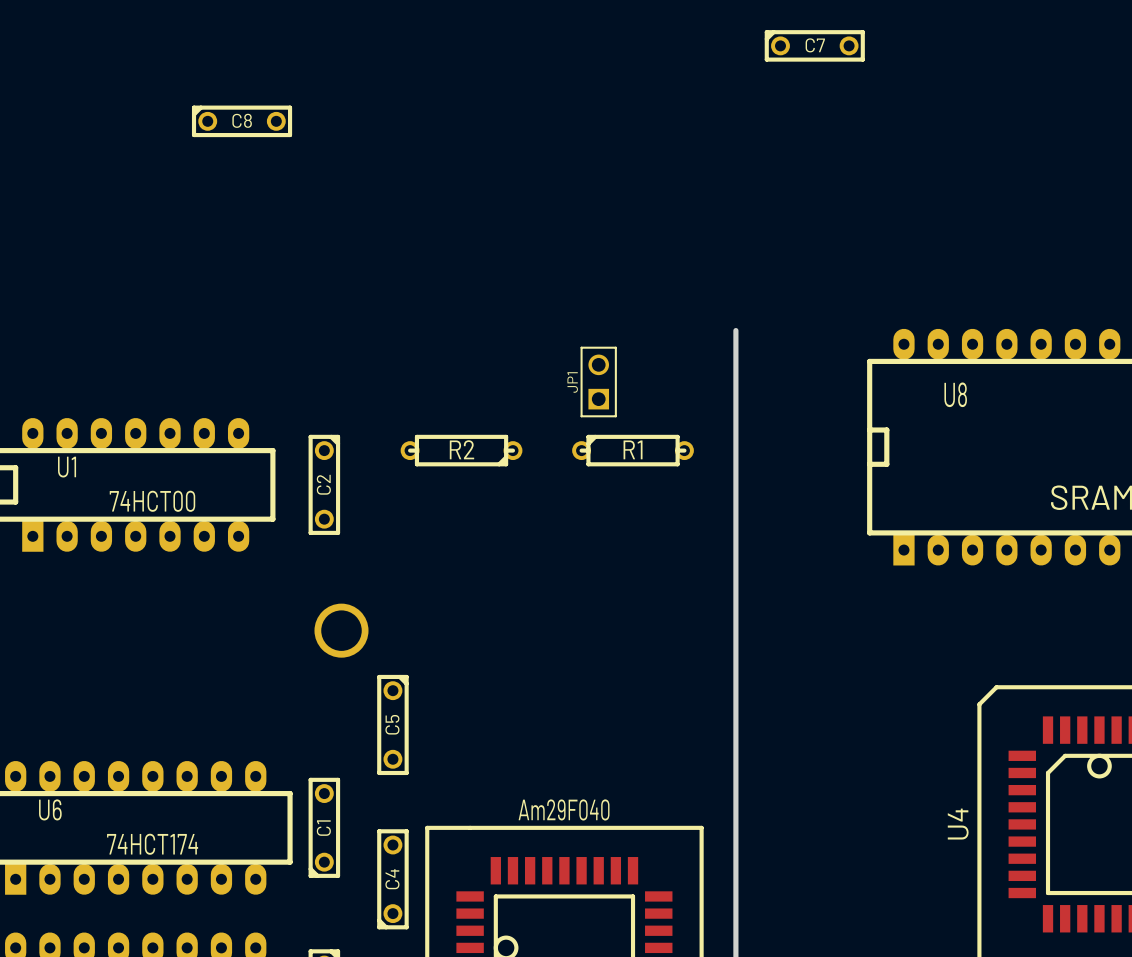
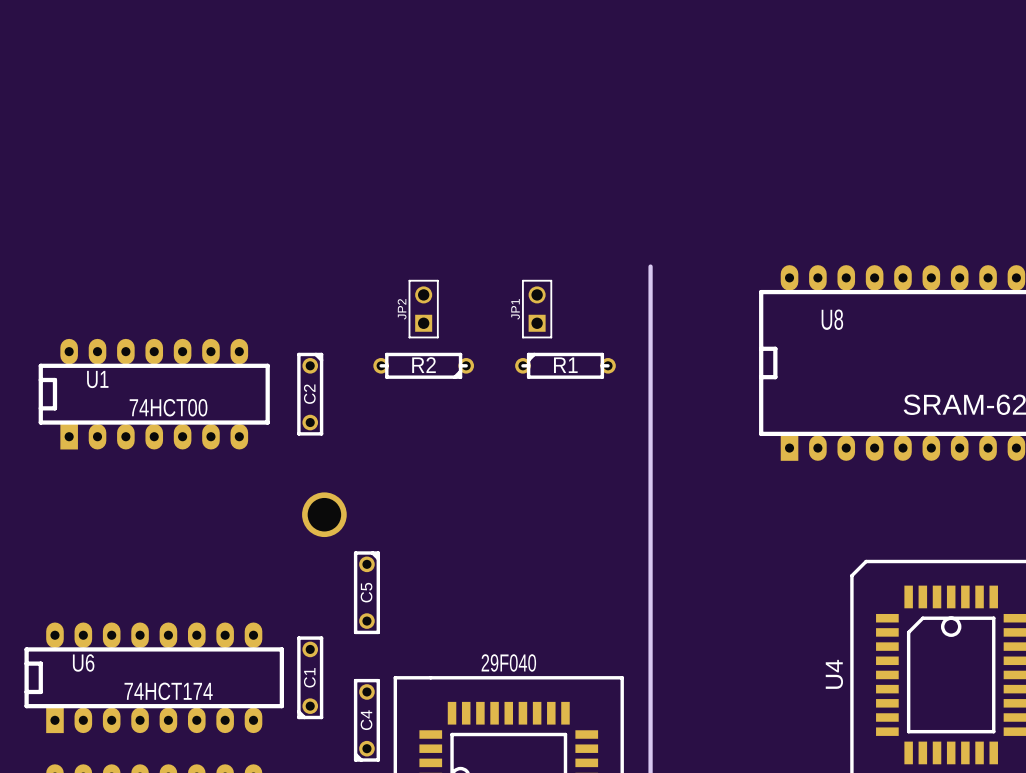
C7: (814, 45) -> none
C8: (242, 121) -> none
JP2: none -> (423, 309)
part value: Am29F040 (564, 809) -> 29F040 (508, 662)

